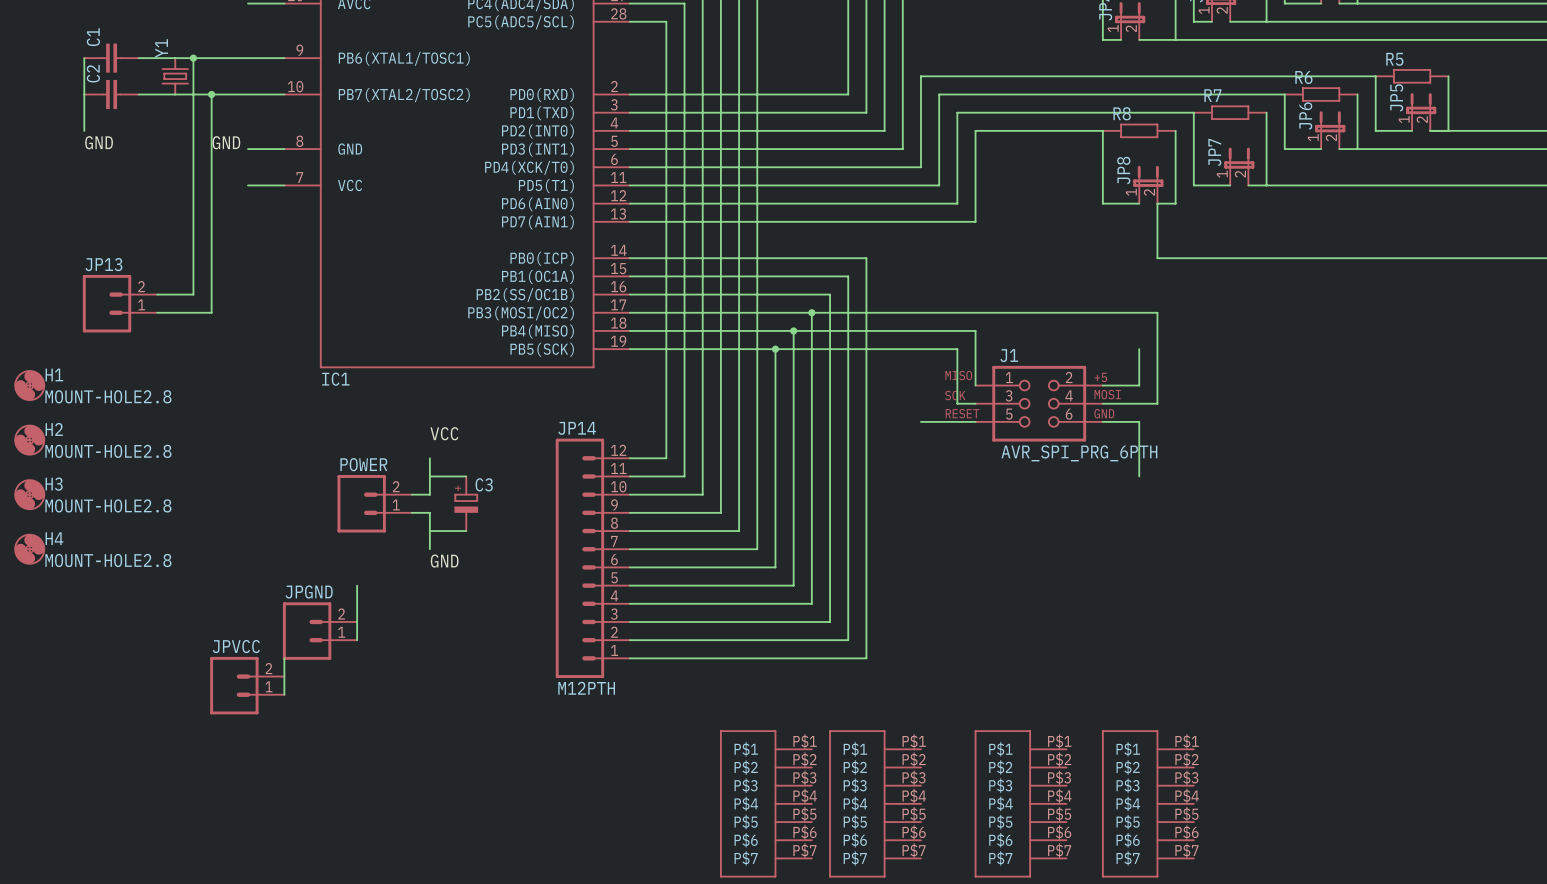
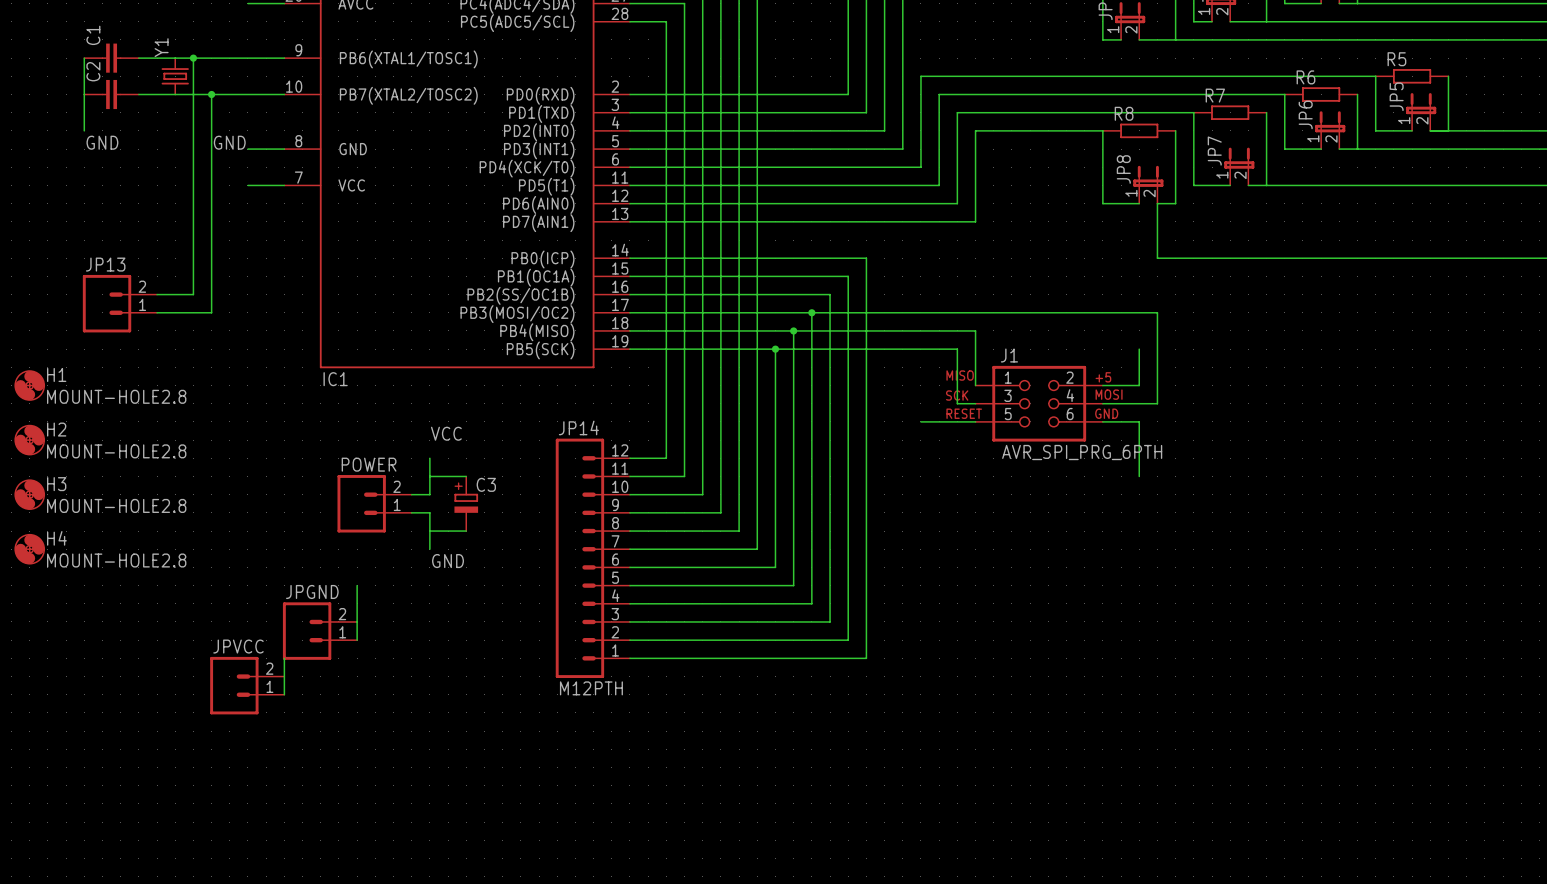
part: (765, 803) -> none
part: (875, 803) -> none
part: (1020, 803) -> none
part: (1147, 803) -> none

